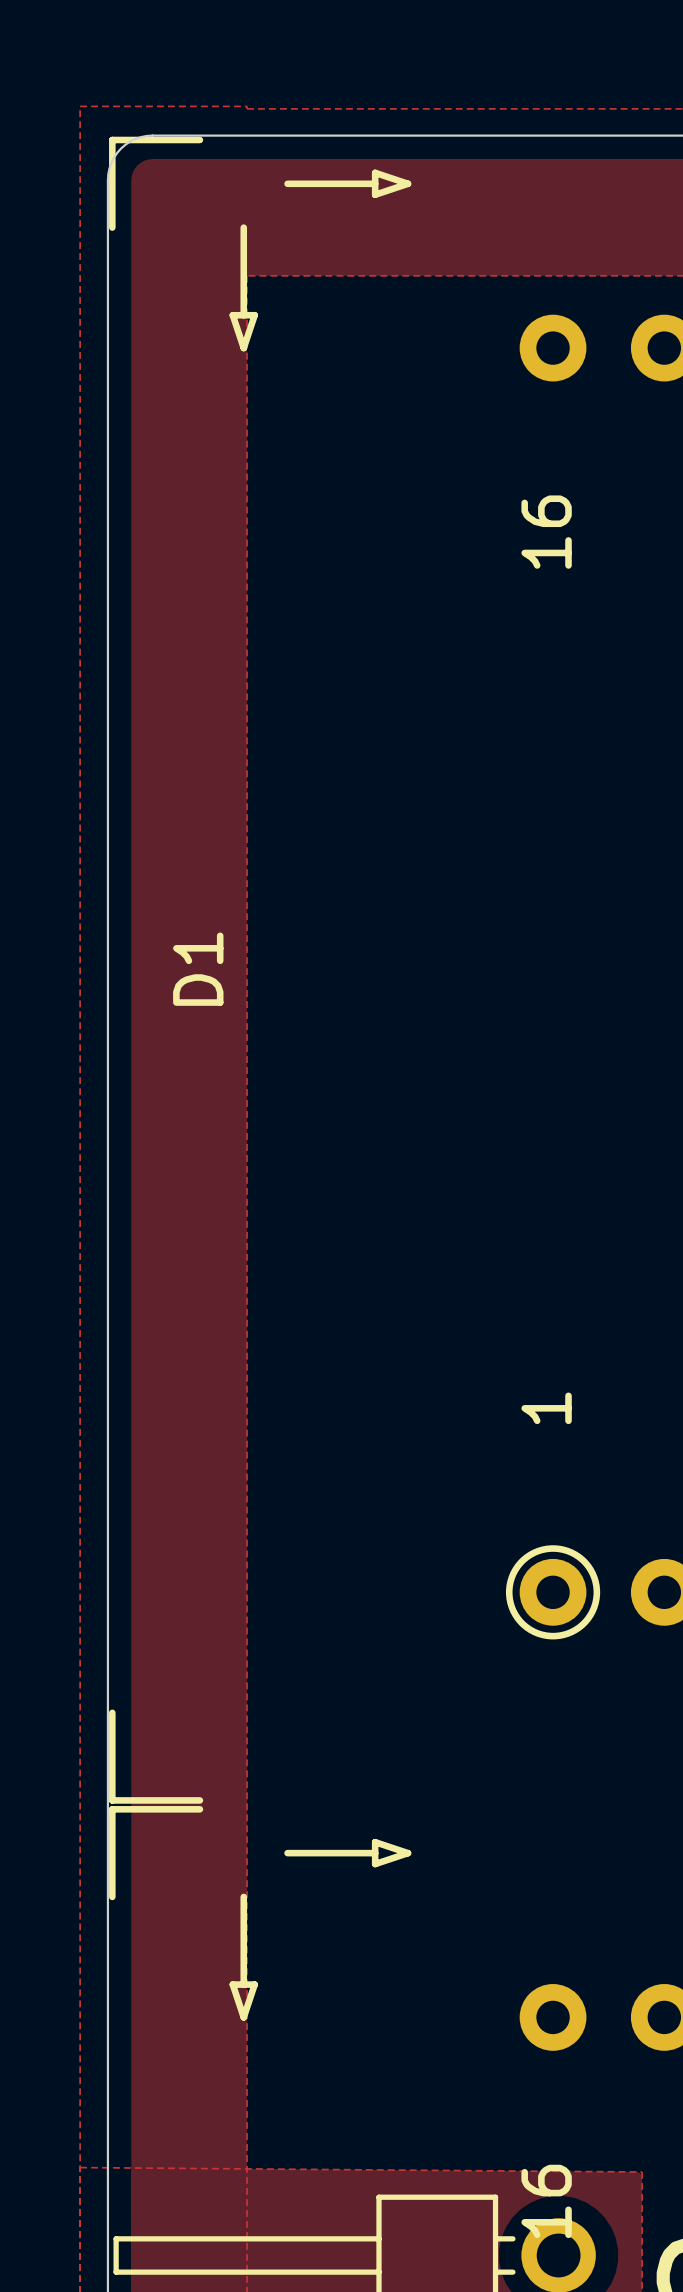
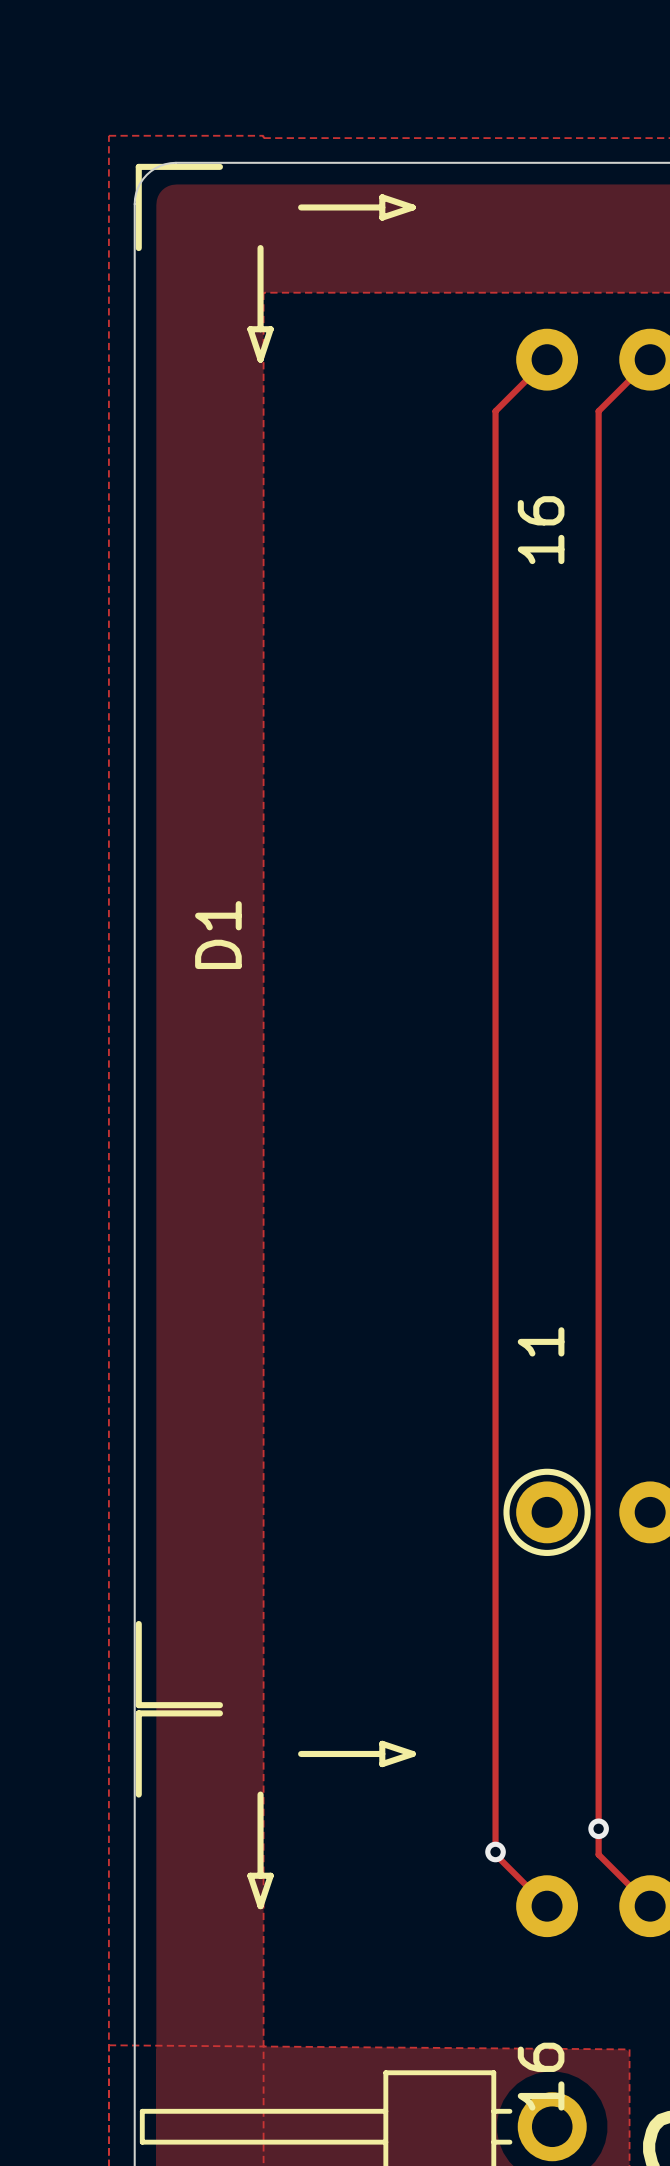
track: none -> (547, 359) (495, 411) (495, 1854) (547, 1906)
track: none -> (650, 359) (598, 411) (598, 1854) (650, 1906)
via: none -> (598, 1828)
via: none -> (495, 1851)

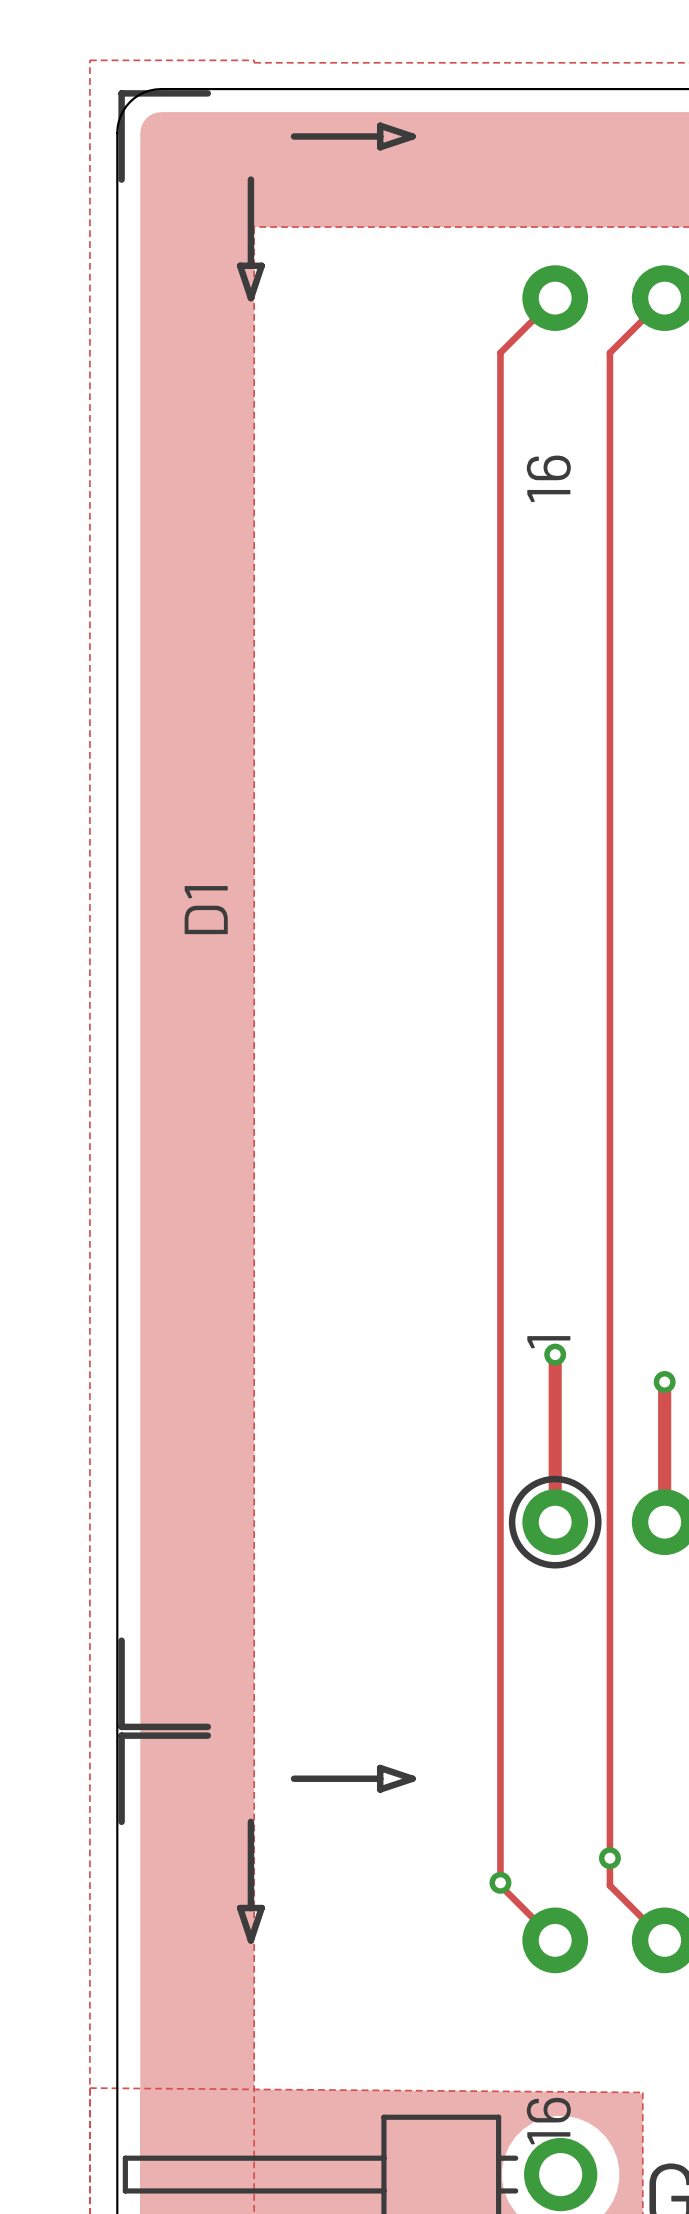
track: none -> (555, 1354) (555, 1522)
via: none -> (555, 1354)
track: none -> (664, 1381) (664, 1522)
via: none -> (664, 1381)

